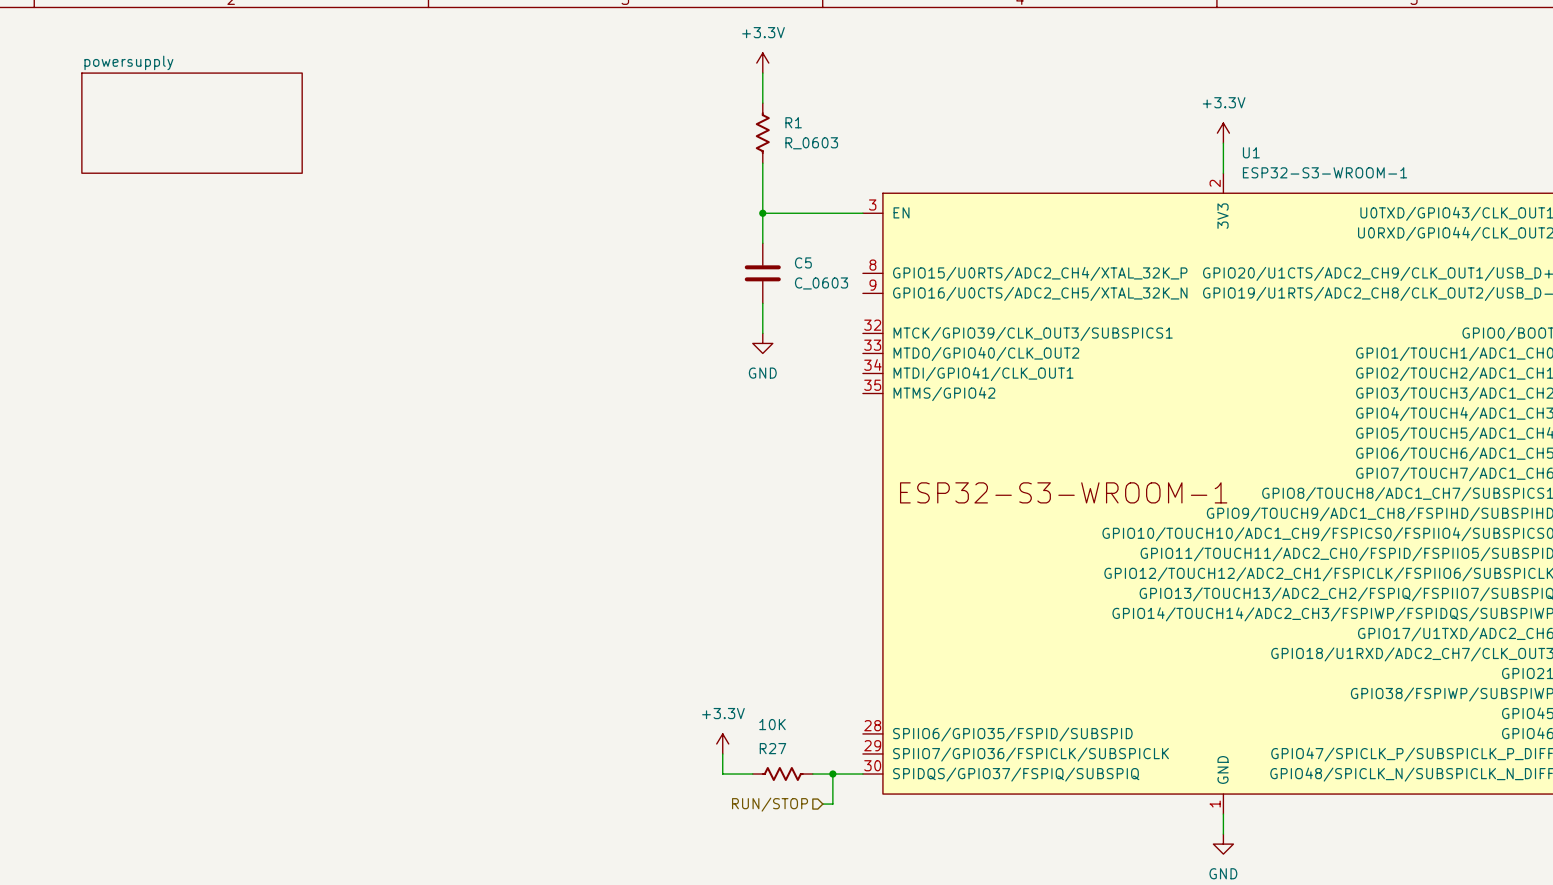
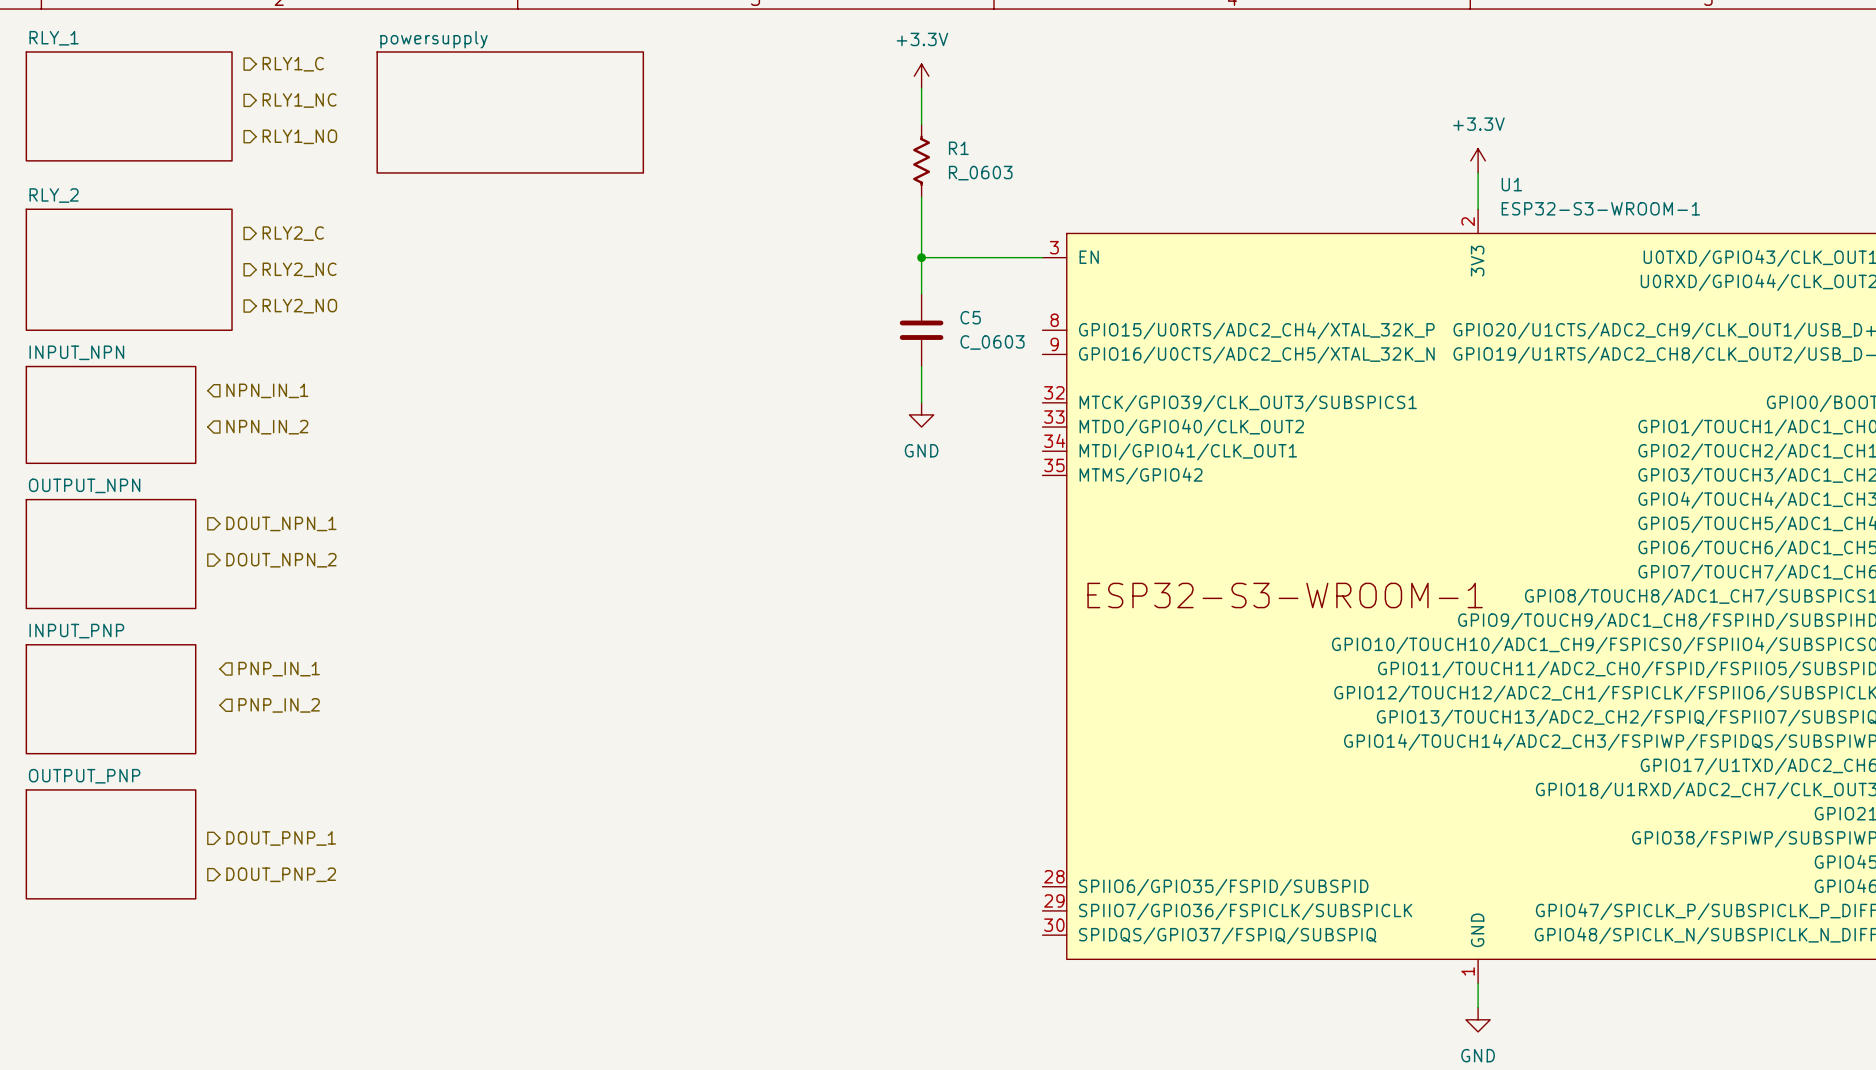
hierarchical label: none -> RLY1_C (293, 64)
hierarchical label: none -> RLY1_NC (299, 100)
sheet RLY_1: none -> (129, 106)
sheet powersupply: none -> (510, 112)
hierarchical label: none -> RLY1_NO (299, 136)
sheet powersupply: (192, 123) -> none
hierarchical label: none -> RLY2_C (293, 233)
sheet RLY_2: none -> (129, 269)
hierarchical label: none -> RLY2_NC (299, 269)
hierarchical label: none -> RLY2_NO (299, 306)
hierarchical label: none -> NPN_IN_1 (267, 390)
sheet INPUT_NPN: none -> (111, 414)
hierarchical label: none -> NPN_IN_2 (267, 427)
hierarchical label: none -> DOUT_NPN_1 (281, 523)
sheet OUTPUT_NPN: none -> (111, 554)
hierarchical label: none -> DOUT_NPN_2 (281, 560)
hierarchical label: none -> PNP_IN_1 (279, 669)
sheet INPUT_PNP: none -> (111, 699)
hierarchical label: none -> PNP_IN_2 (279, 705)
hierarchical label: none -> DOUT_PNP_1 (281, 838)
sheet OUTPUT_PNP: none -> (111, 844)
hierarchical label: none -> DOUT_PNP_2 (281, 874)
power symbol: +3.3V (722, 743) -> none
wire: (722, 753) (722, 774) (752, 774) -> none
R27: (782, 774) -> none
wire: (812, 774) (862, 774) -> none
wire: (832, 774) (832, 804) (822, 804) -> none
junction: (832, 774) -> none
hierarchical label: RUN/STOP (770, 804) -> none

